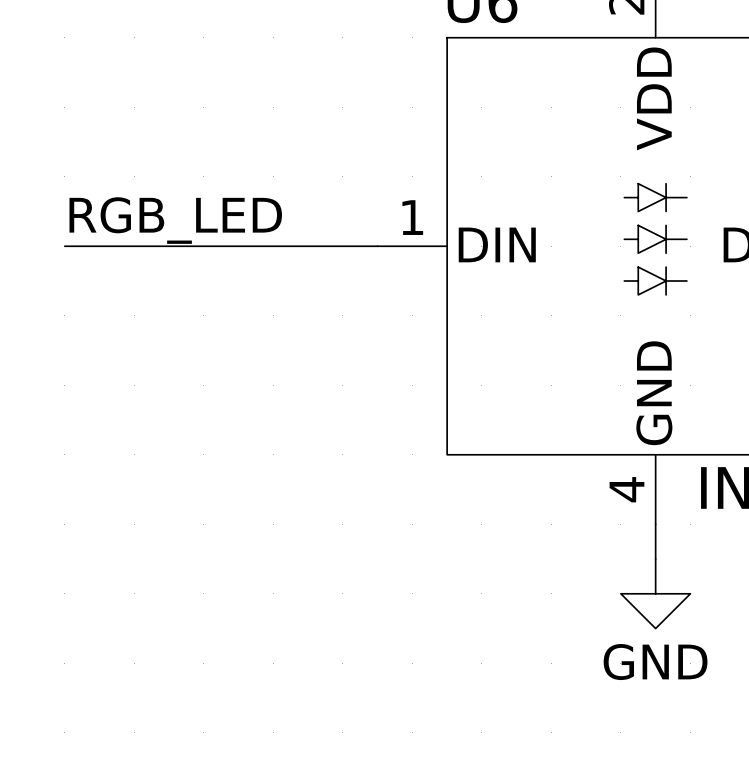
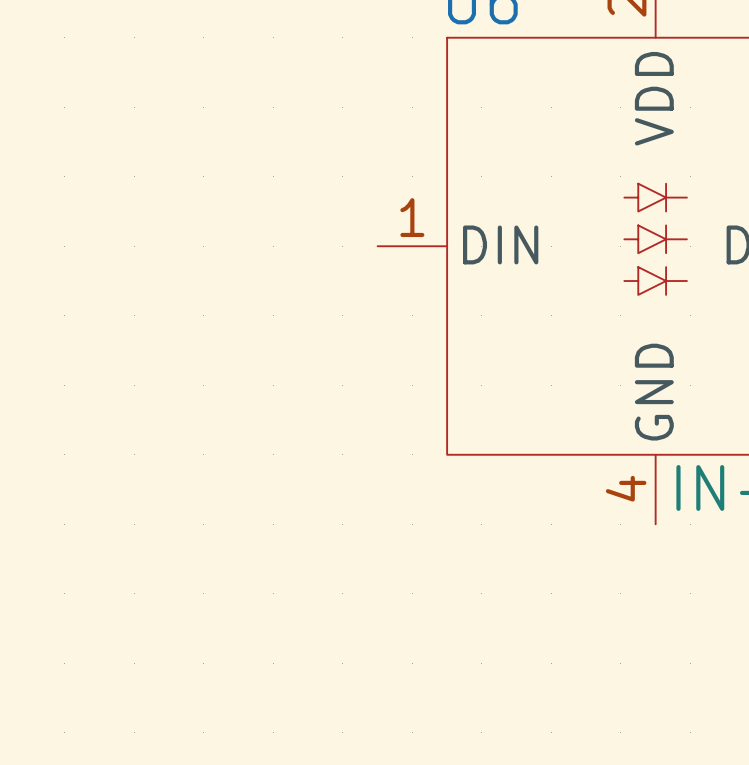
label: RGB_LED (175, 220) -> none
wire: (64, 246) (377, 246) -> none
wire: (655, 524) (655, 559) -> none
power symbol: GND (655, 593) -> none

